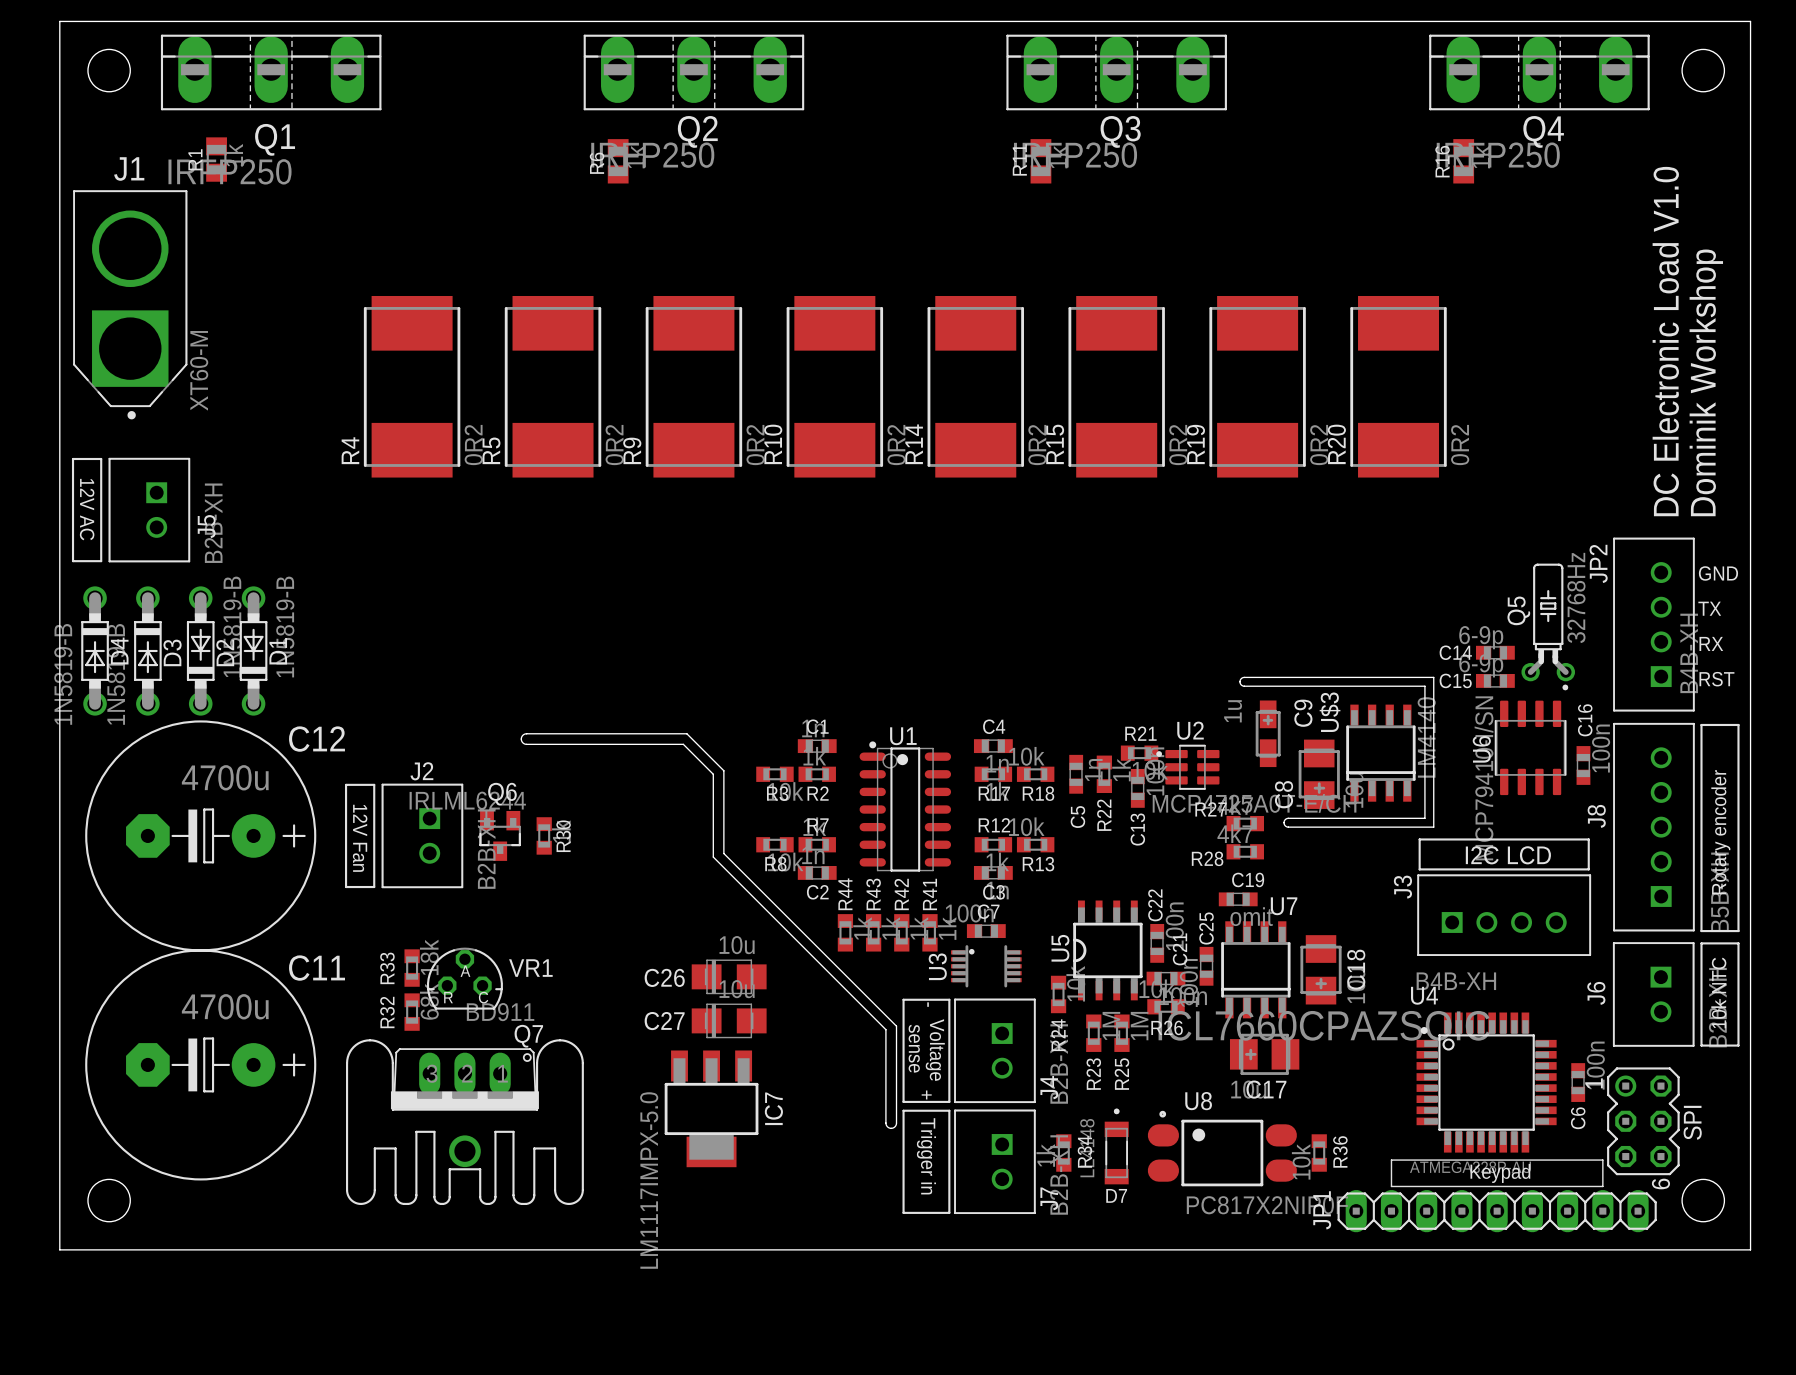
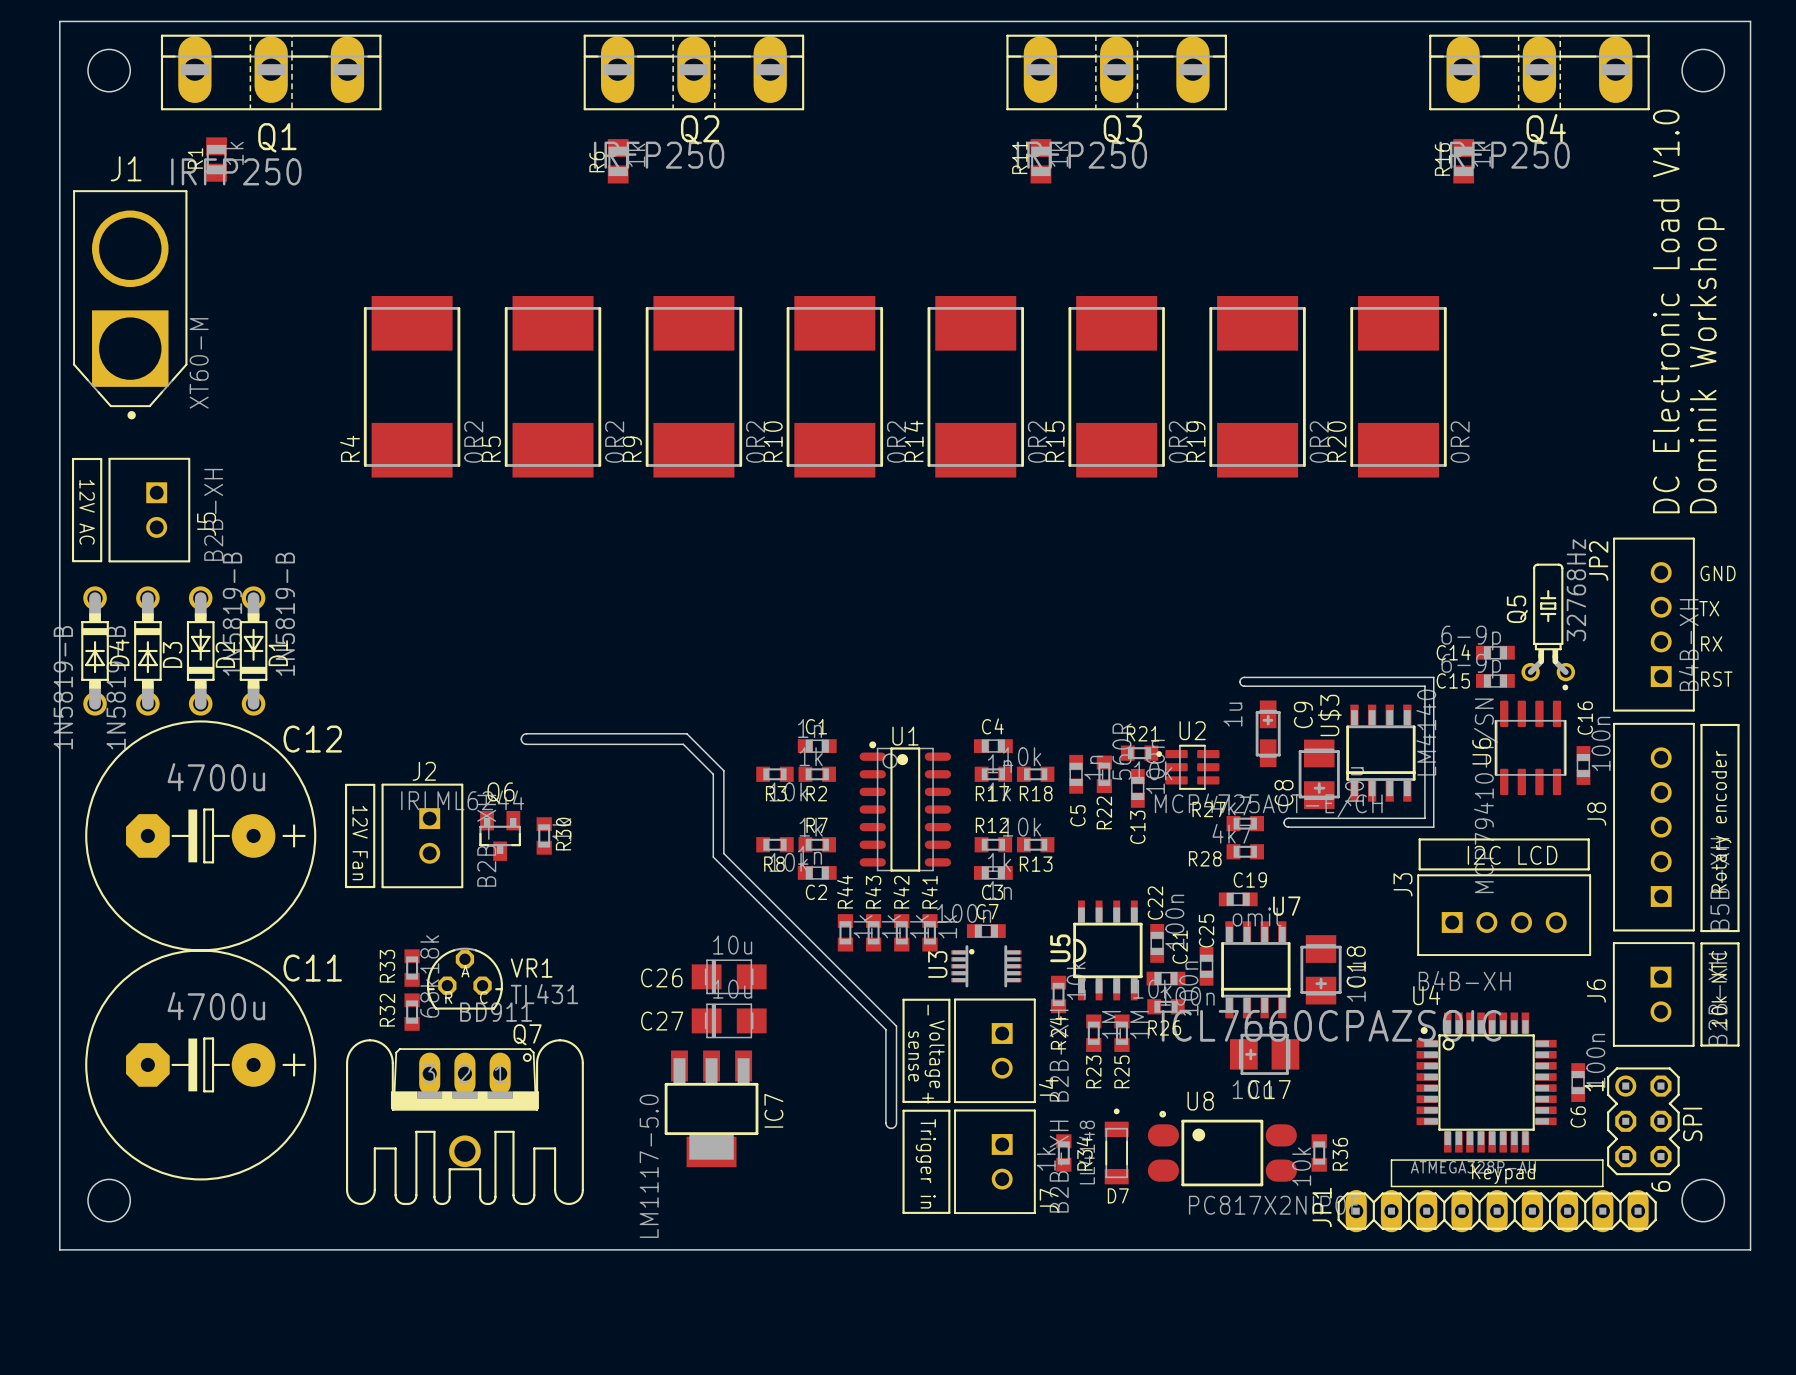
R22 value: 1k (1121, 770) -> 560R (1121, 751)
VR1 value: none -> TL431 (544, 994)
IC7 value: LM1117IMPX-5.0 (649, 1180) -> LM1117-5.0 (649, 1166)

